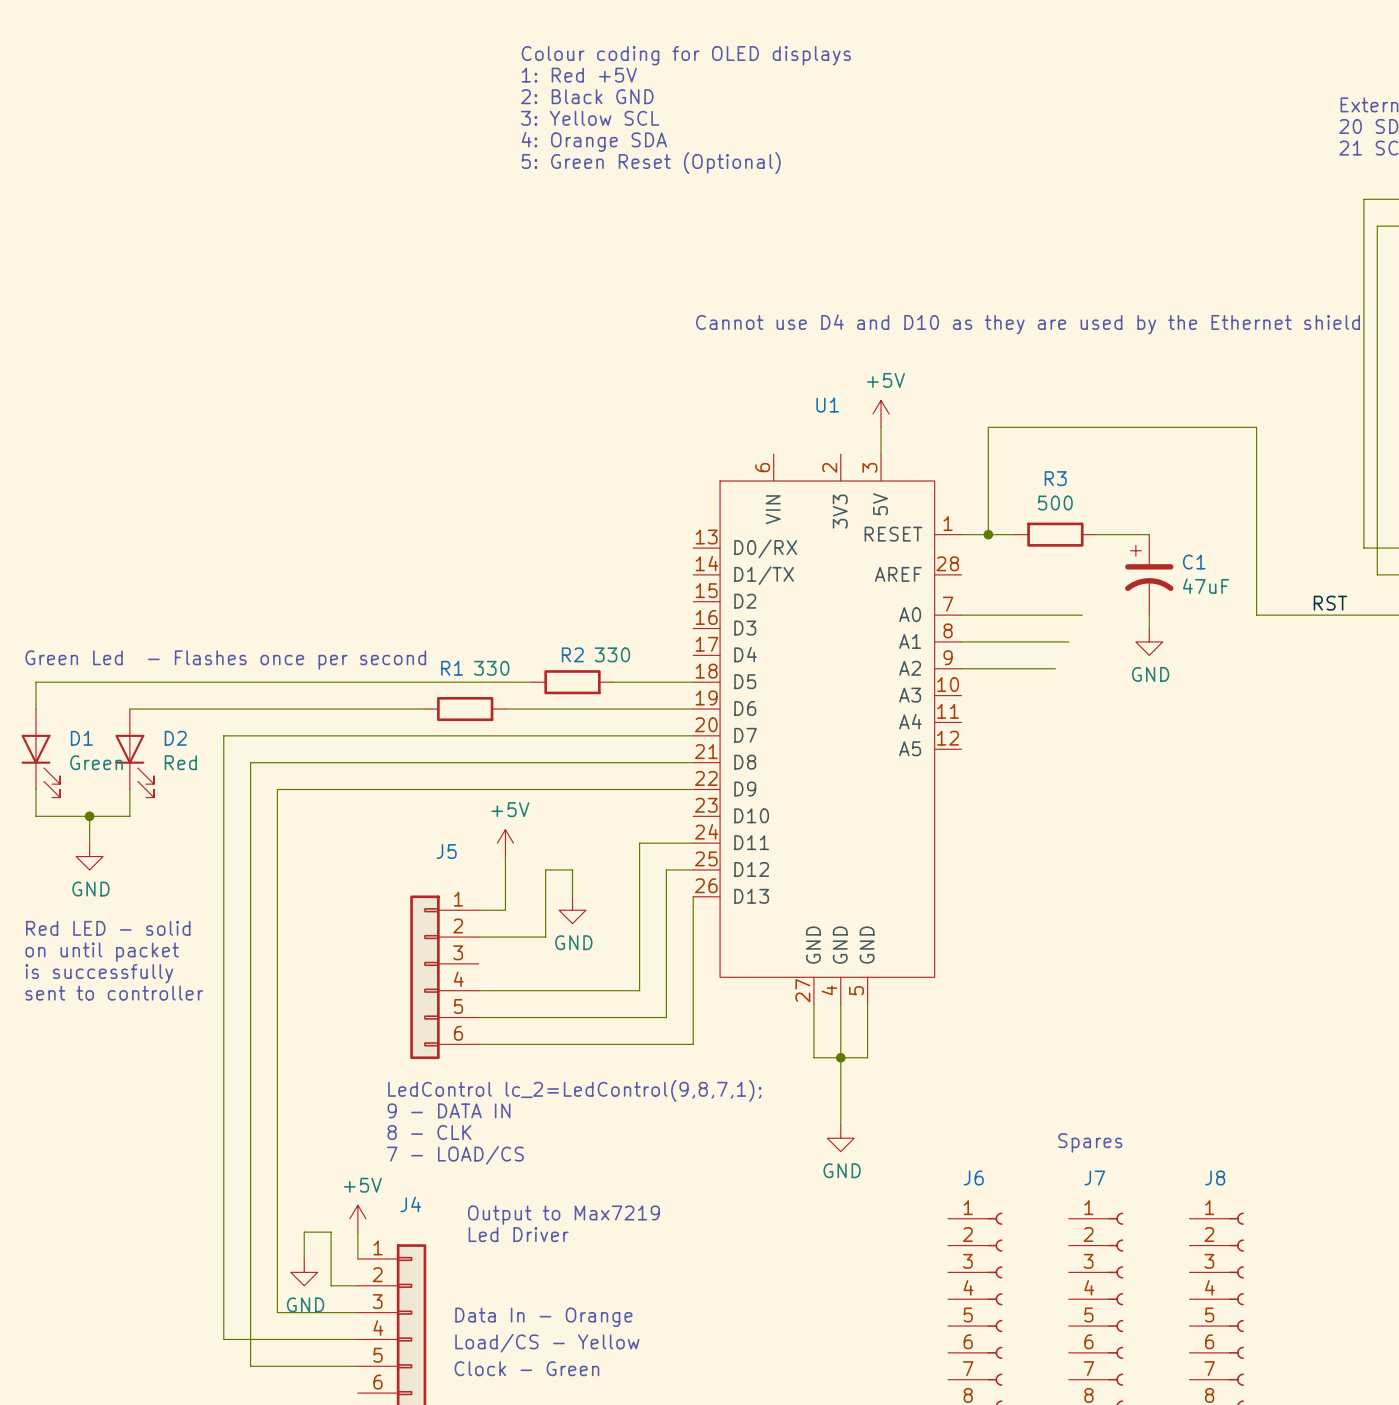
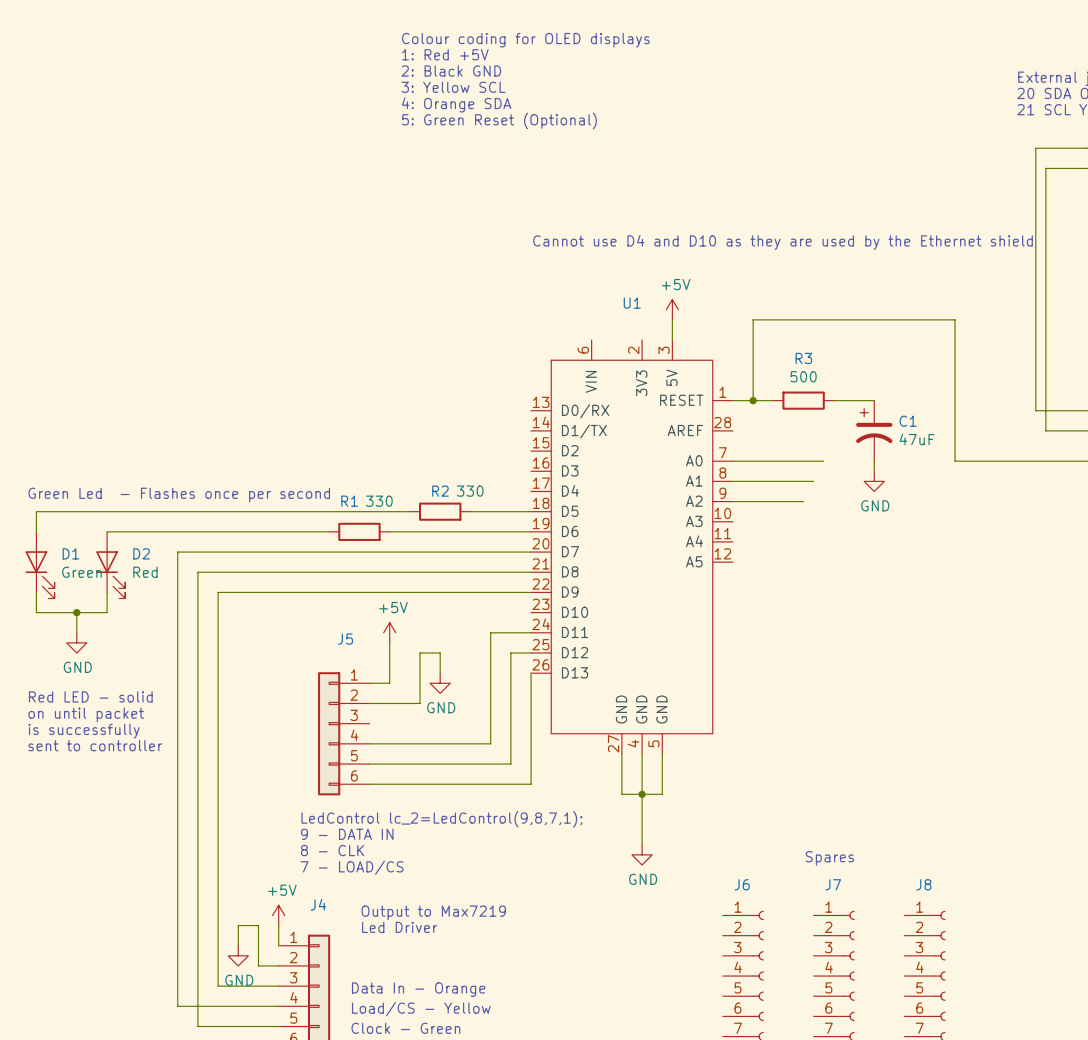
label: RST (1330, 603) -> none

